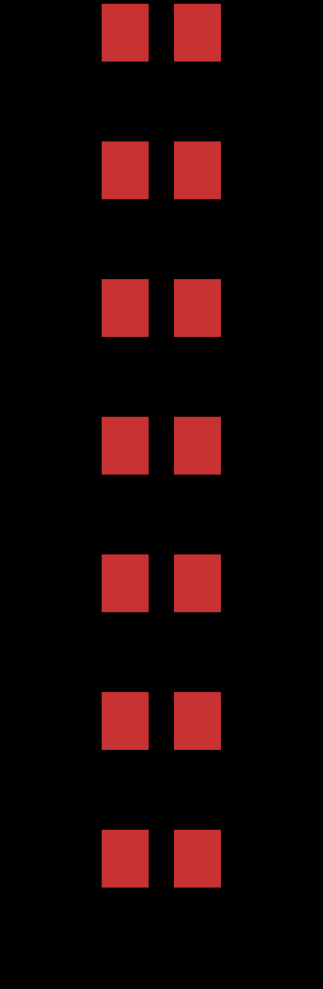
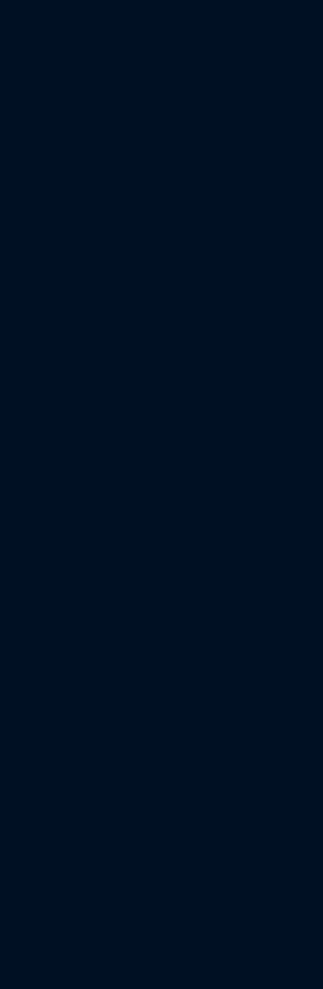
part: (161, 32) -> none
part: (161, 170) -> none
part: (161, 308) -> none
part: (161, 445) -> none
part: (161, 583) -> none
part: (161, 720) -> none
part: (161, 858) -> none

